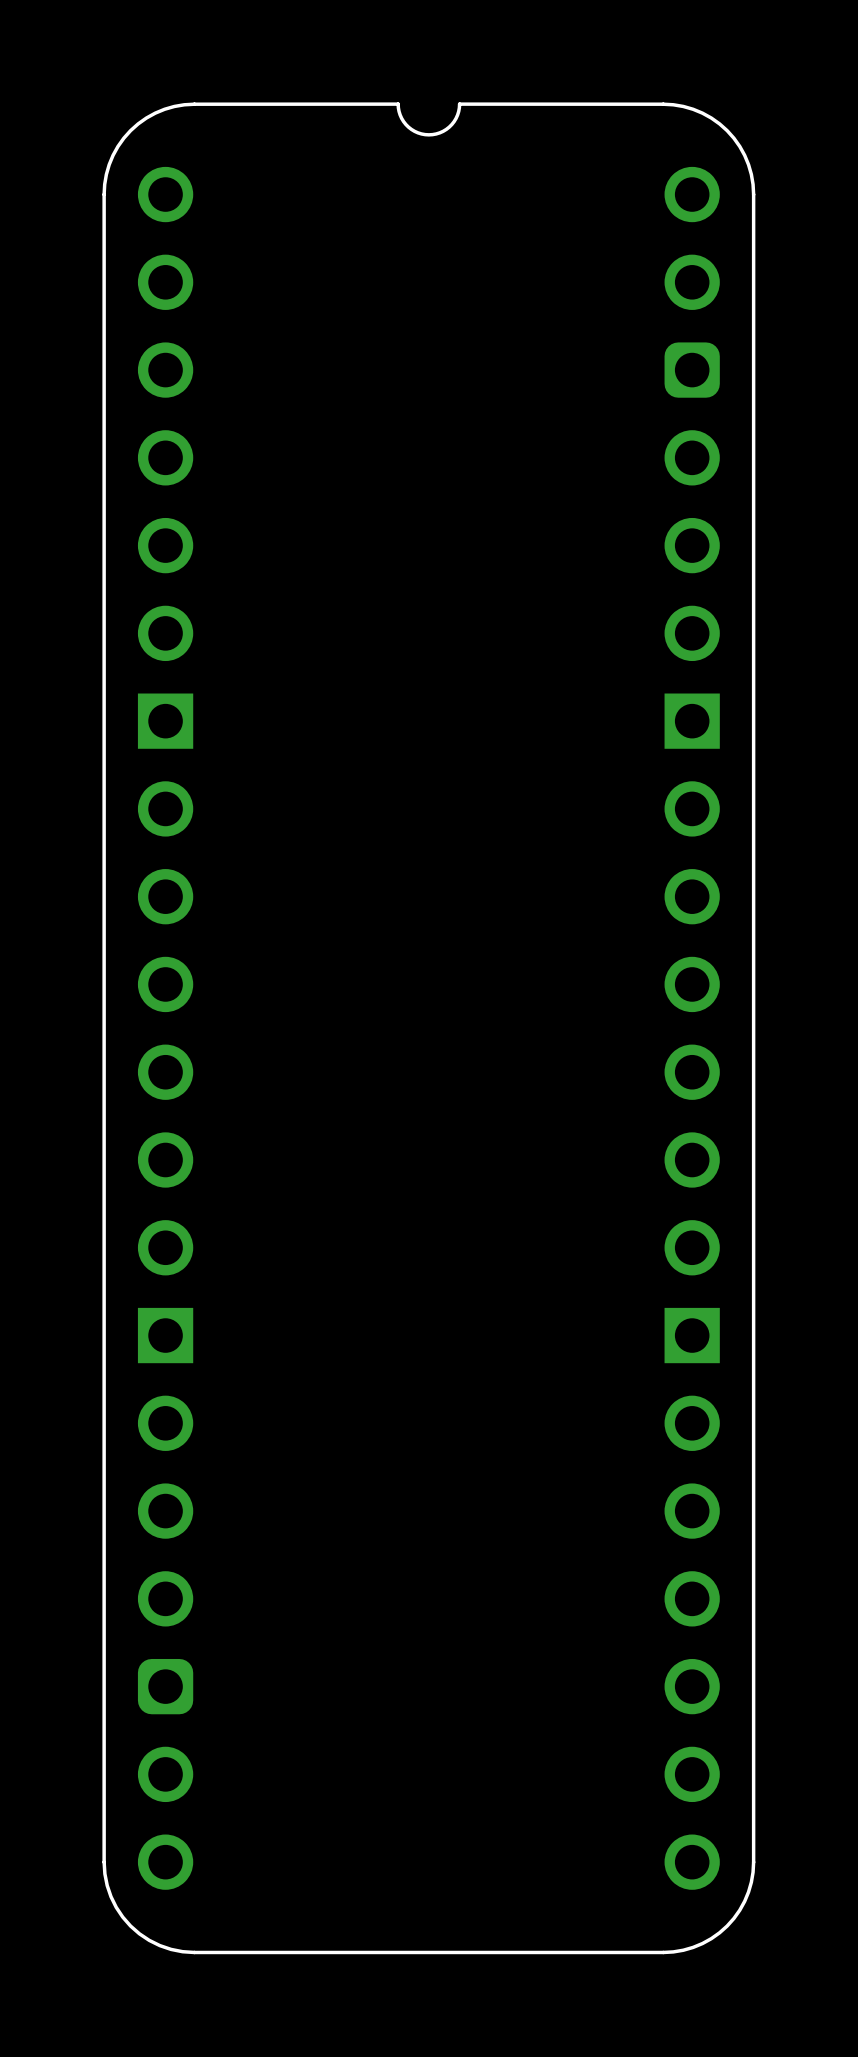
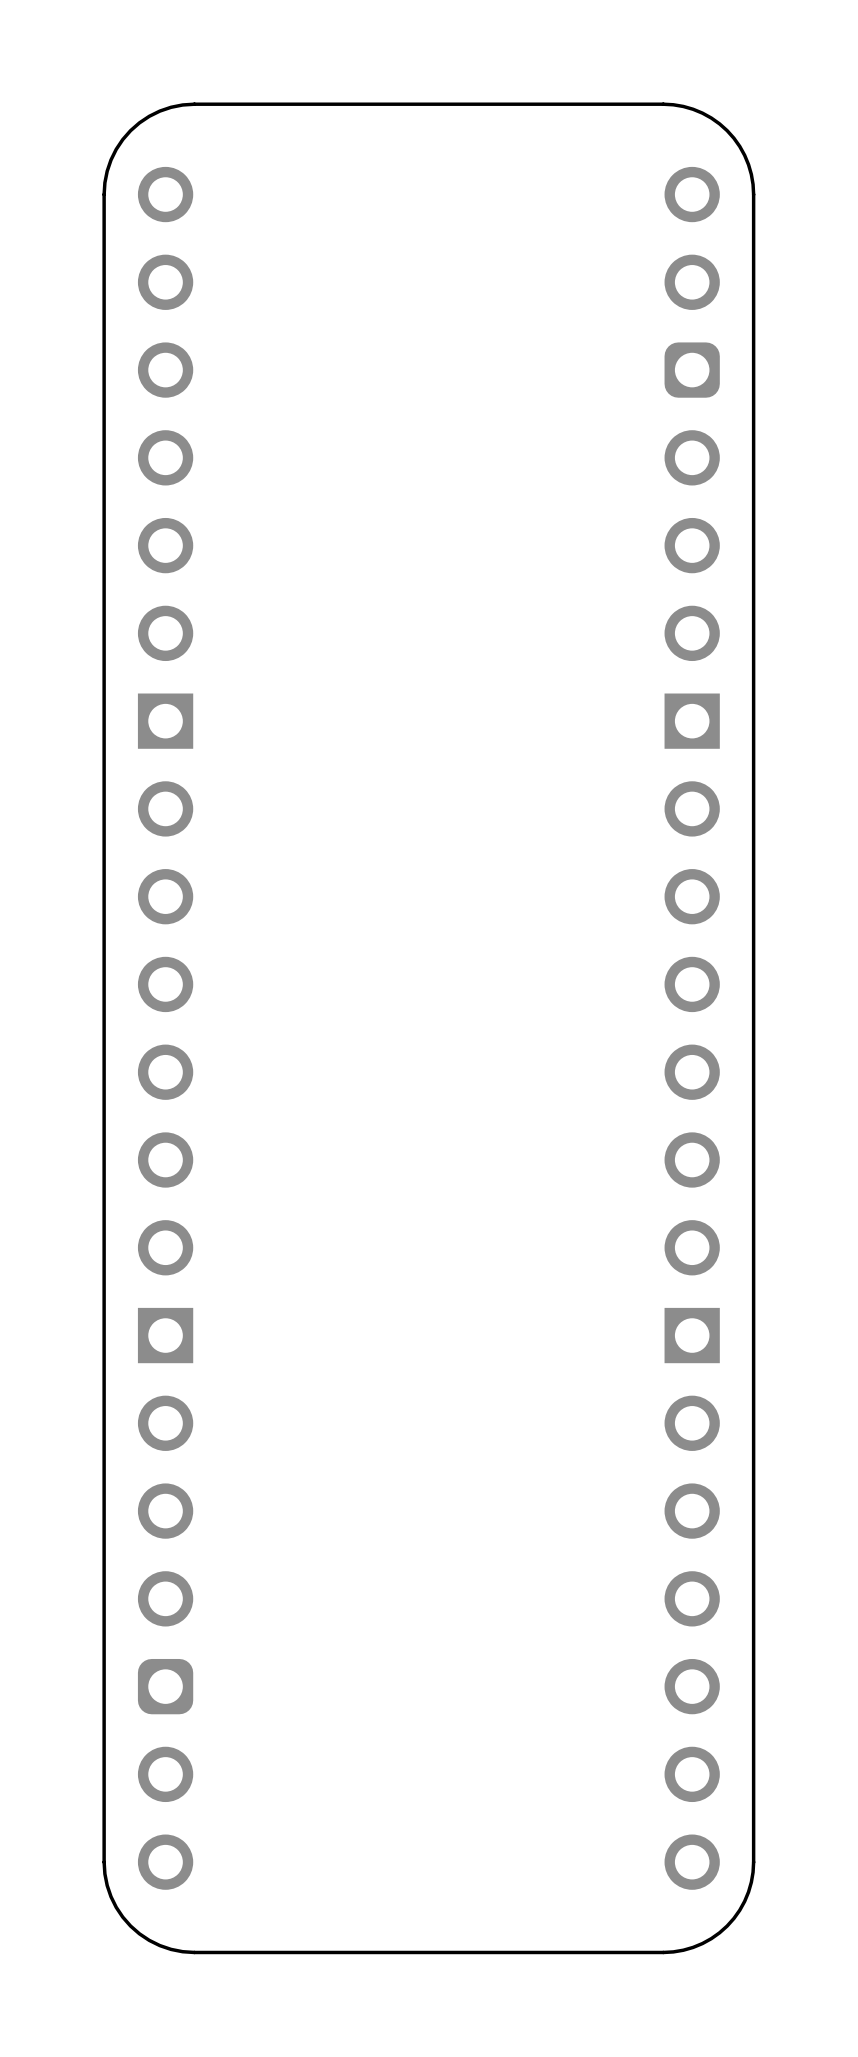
part footprint: [102, 102, 756, 1955] -> [102, 102, 756, 1955]

